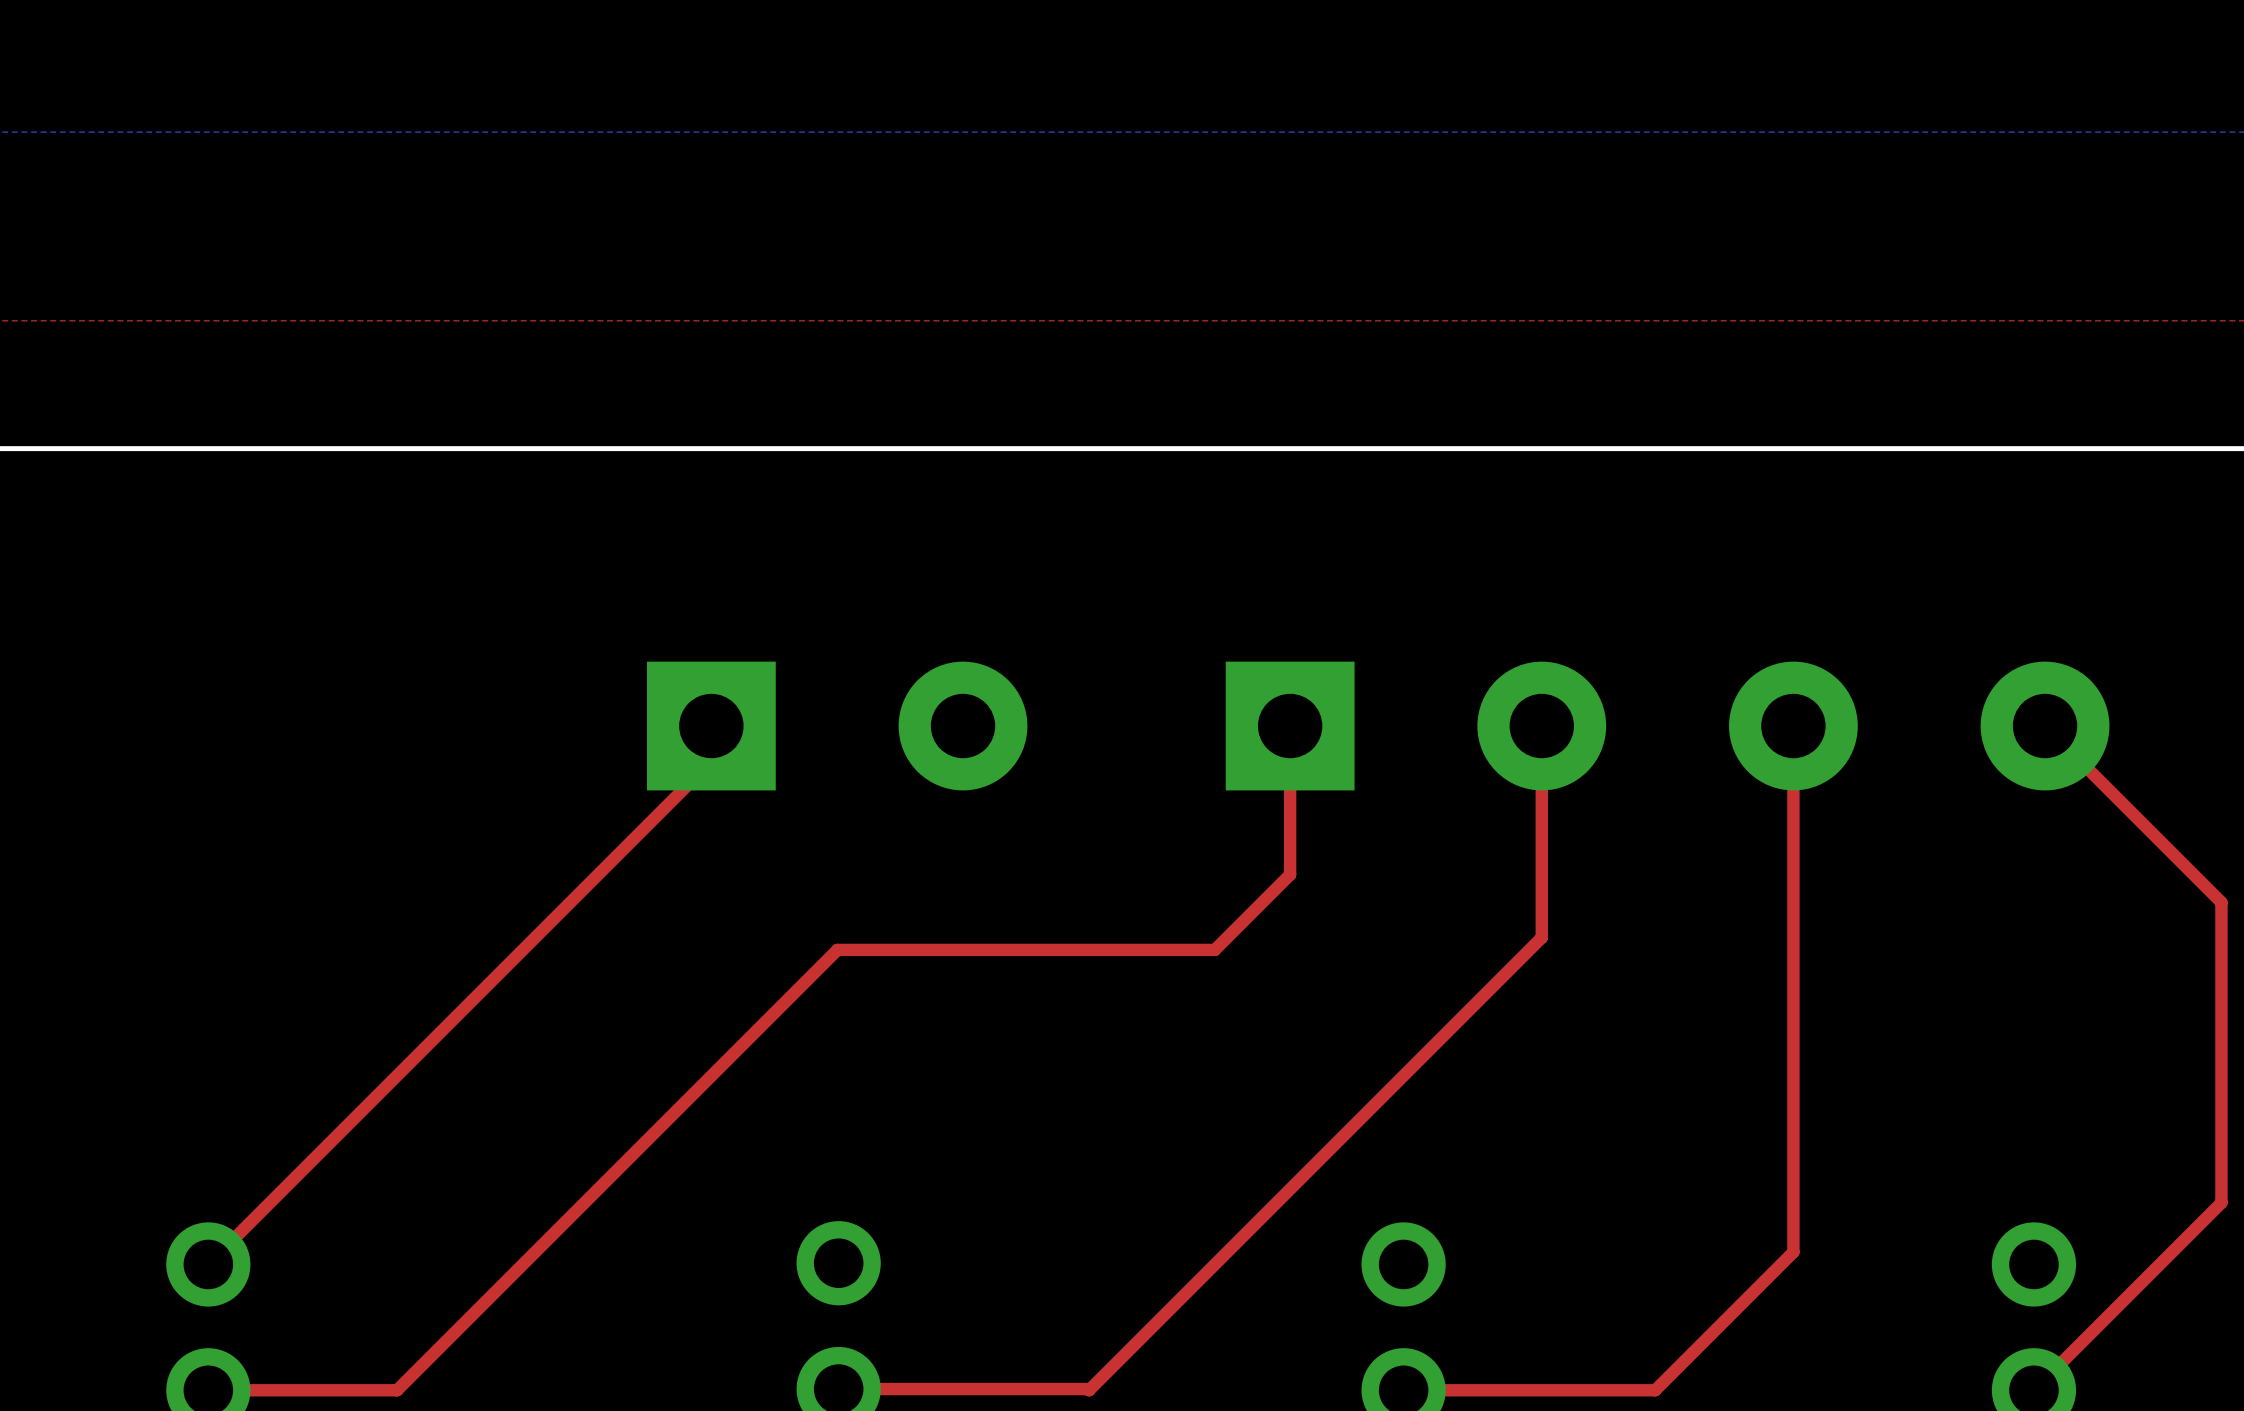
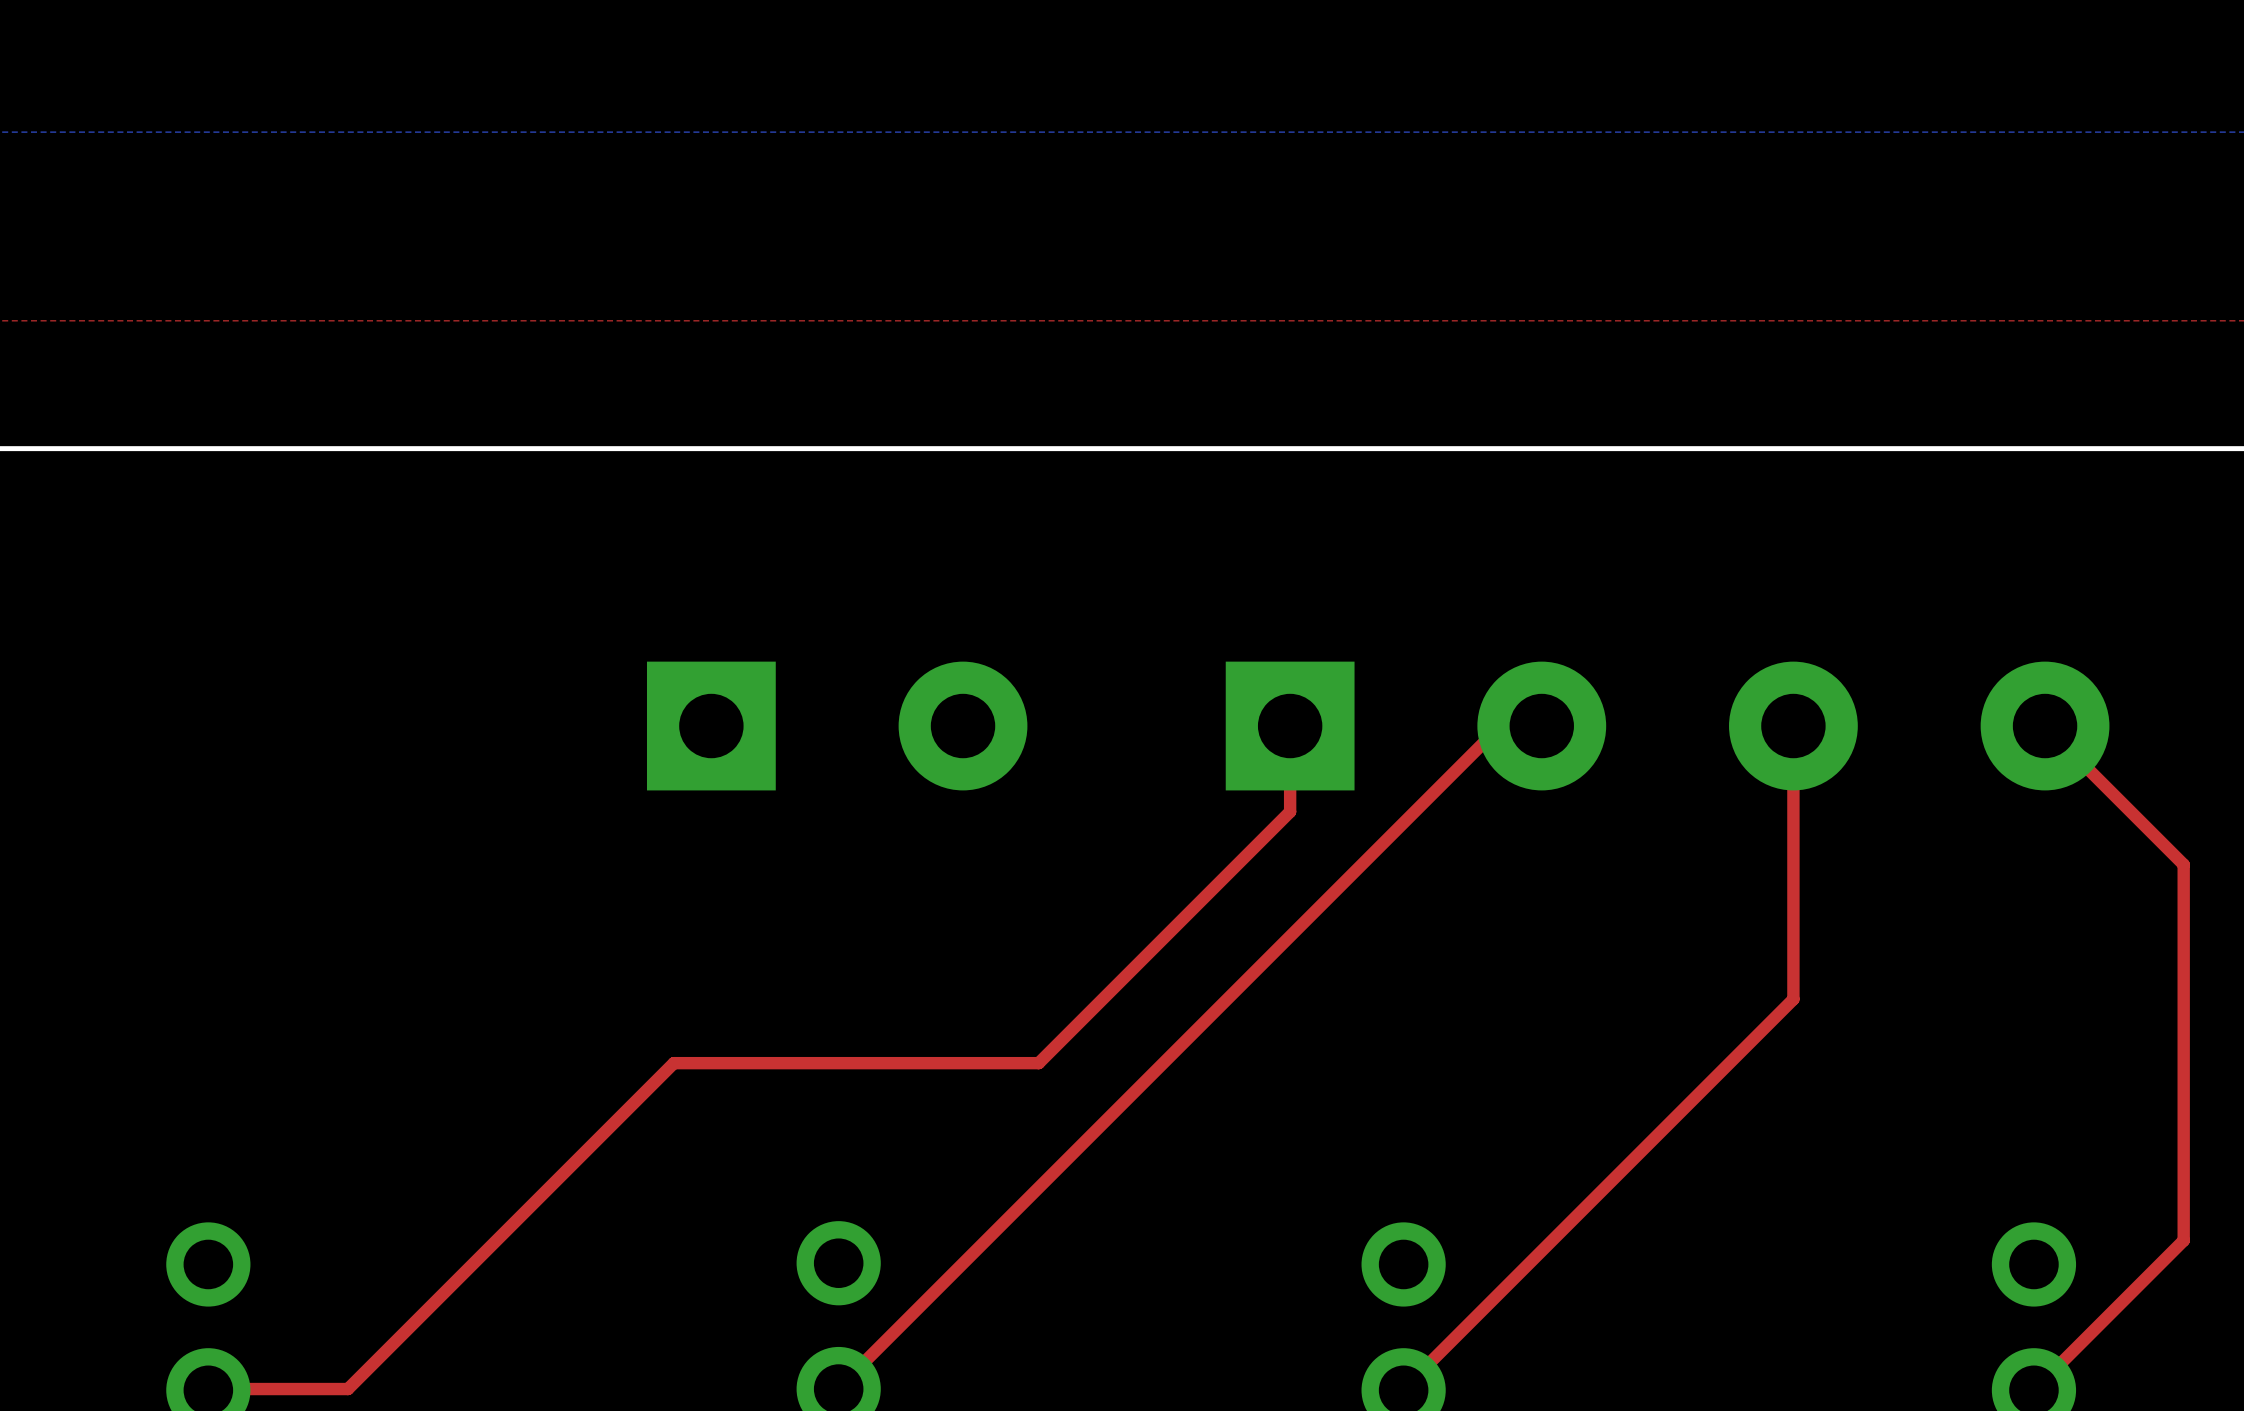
top track: (711, 726) (711, 761) (208, 1264) -> none
top track: (1541, 726) (1541, 937) (1089, 1390) (838, 1389) -> (1541, 726) (1500, 726) (837, 1389)
top track: (1290, 811) (1290, 874) (1214, 949) (837, 949) (397, 1390) (208, 1390) -> (1290, 811) (1038, 1063) (673, 1063) (347, 1389) (209, 1389)
top track: (2183, 864) (2221, 902) (2221, 1202) (2183, 1240) -> (2183, 864) (2183, 1240)
top track: (1793, 999) (1793, 1252) (1655, 1390) (1403, 1390) -> (1793, 999) (1403, 1389)

